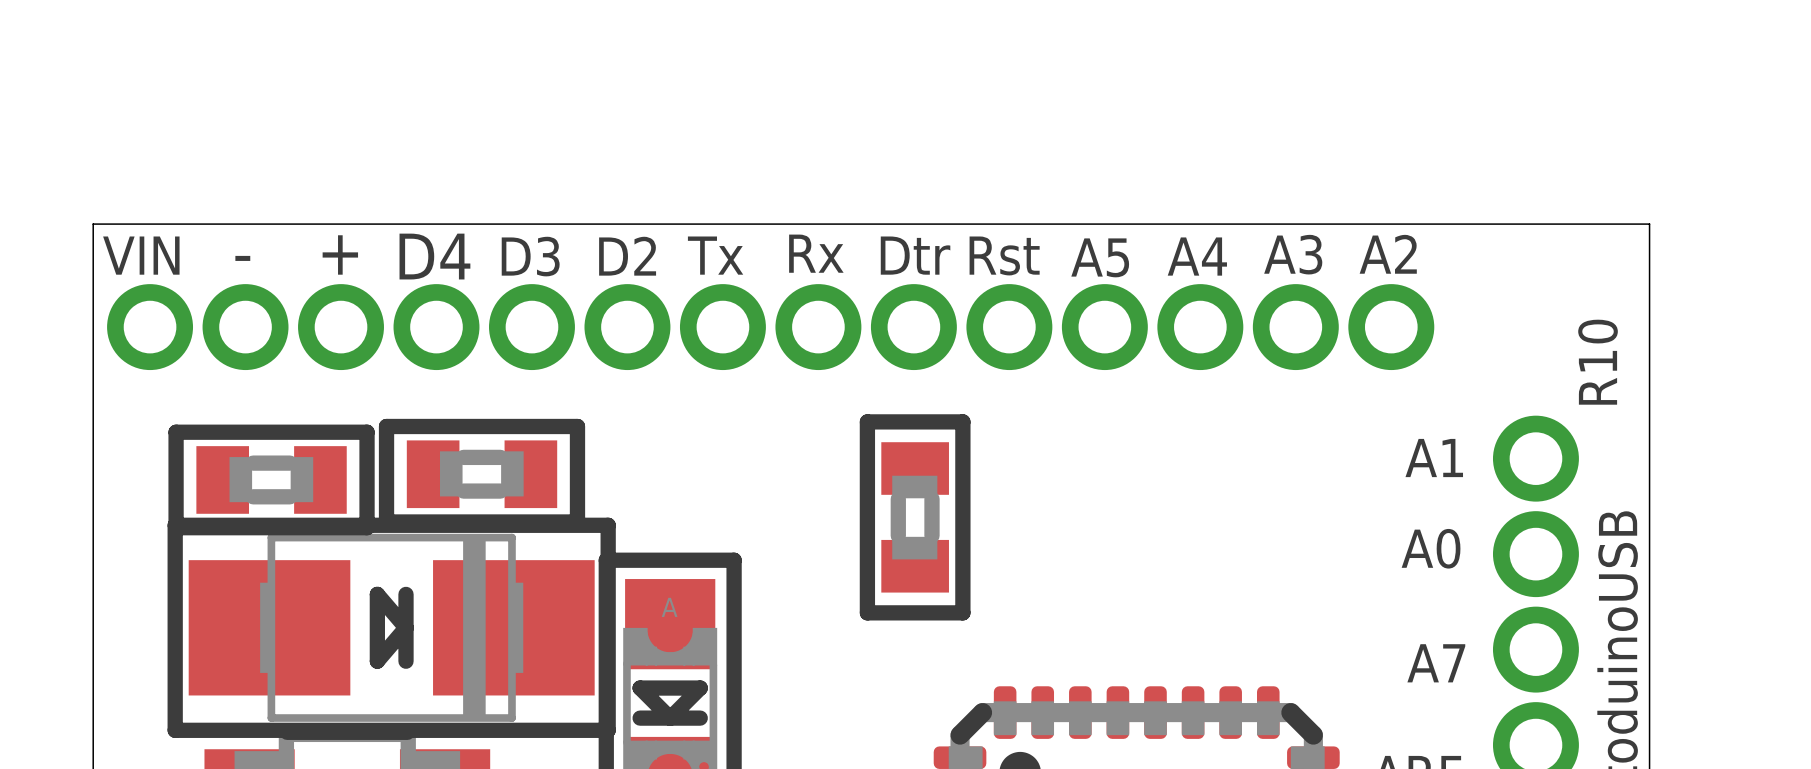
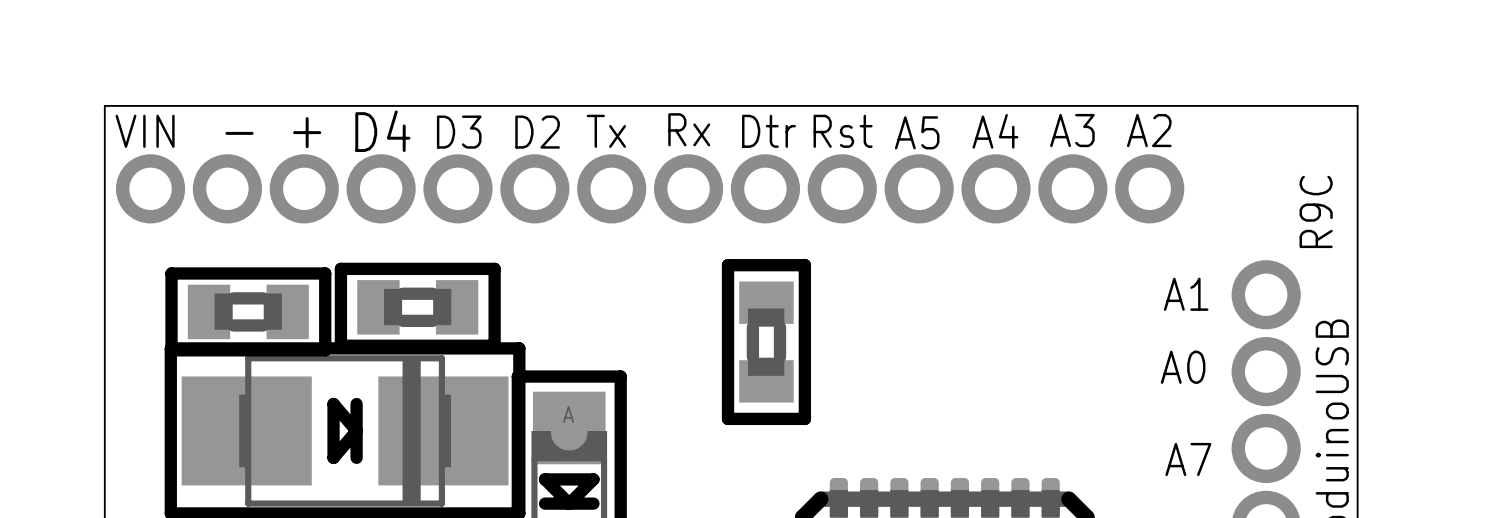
text: R10 (1598, 362) -> R9C (1316, 211)

